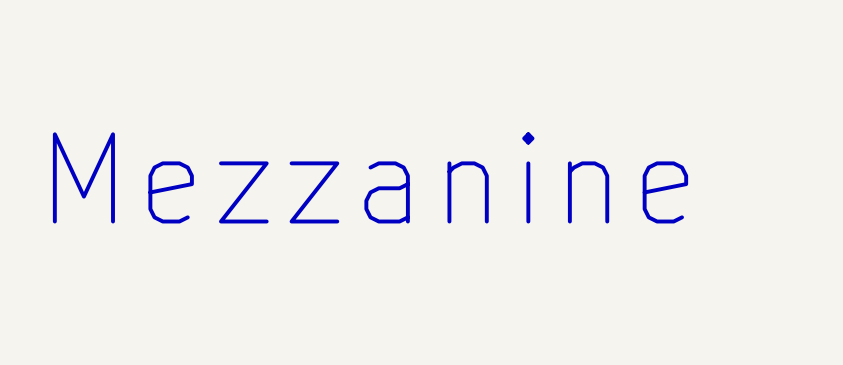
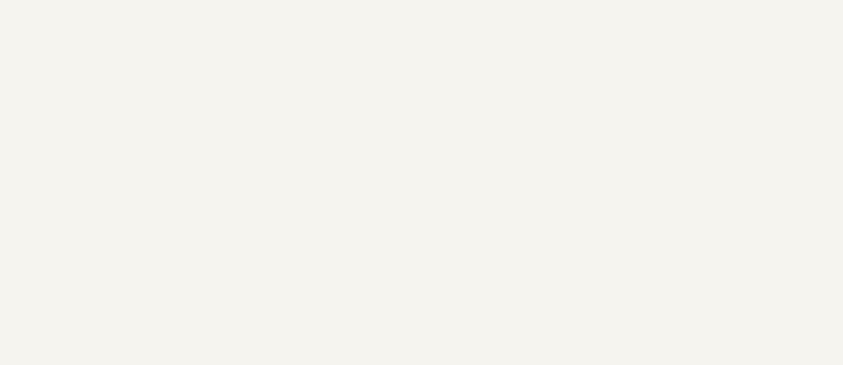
text: Mezzanine (370, 177) -> none

